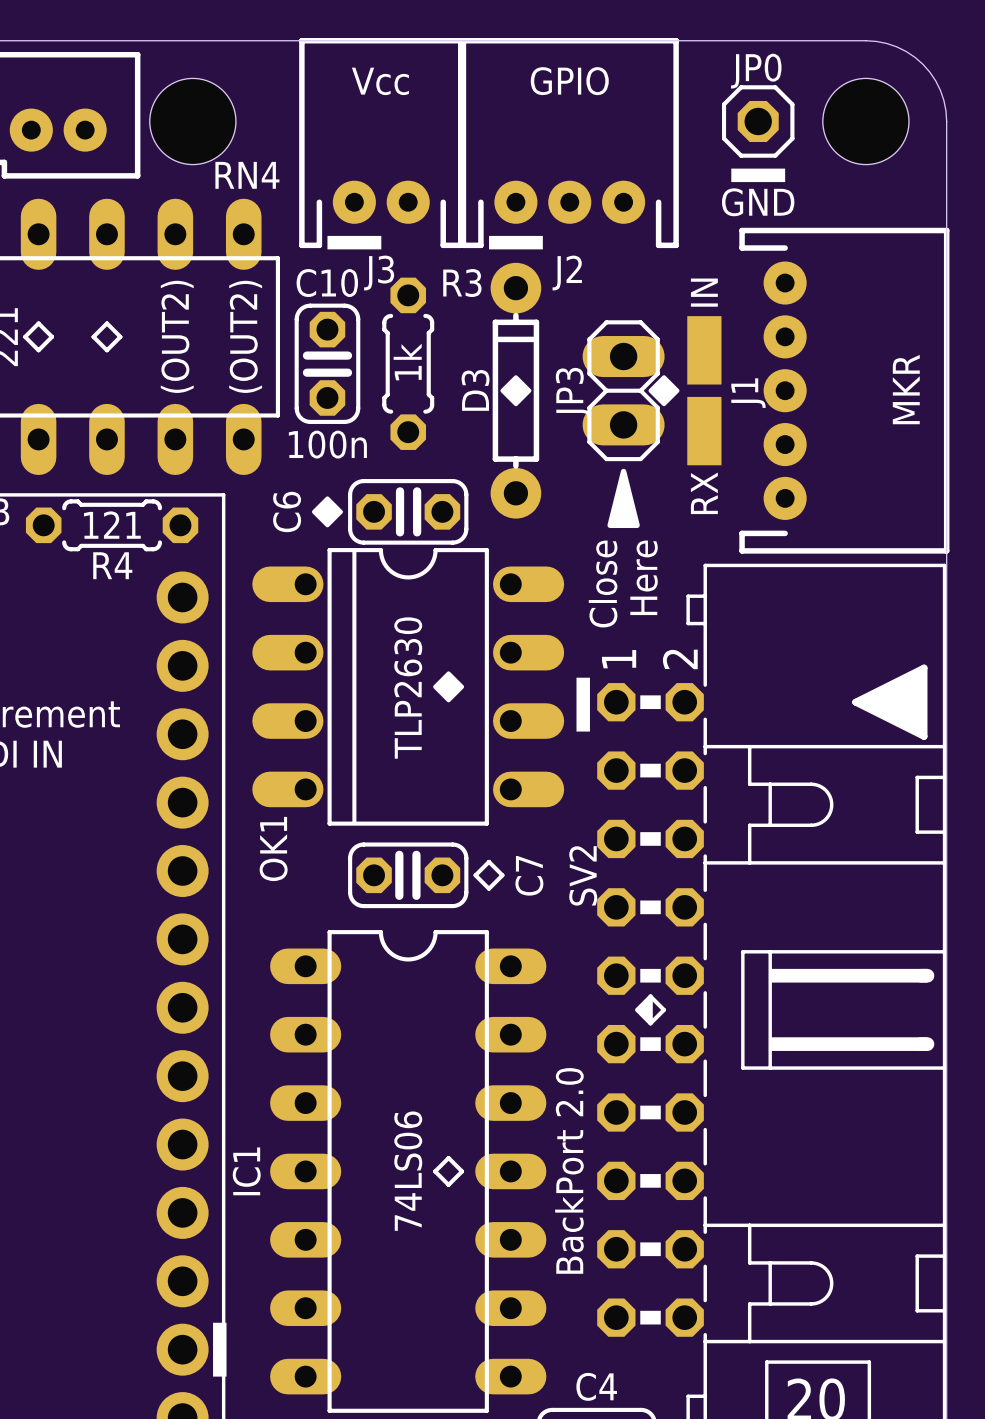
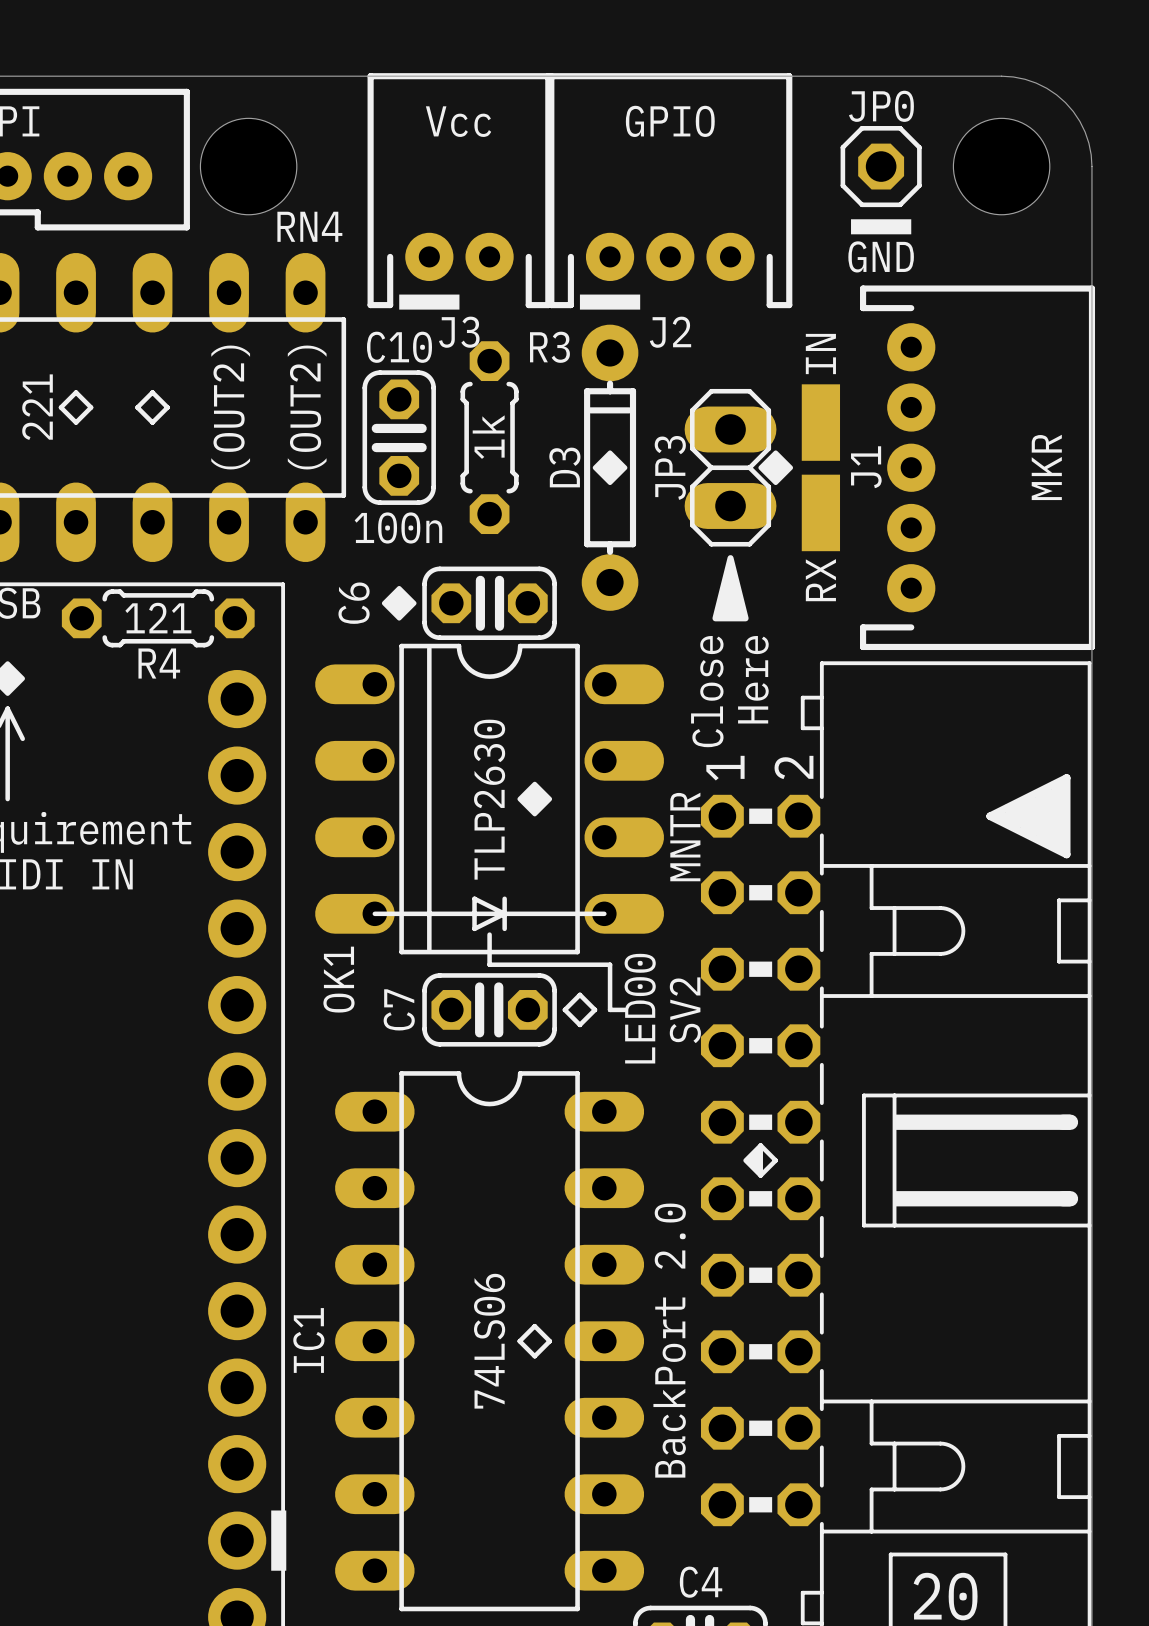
drawing: [576, 677, 590, 732] -> none
text: none -> MNTR (685, 836)
line: none -> (474, 898) (474, 928) (504, 913) (474, 898)
line: none -> (504, 898) (504, 928)
line: none -> (374, 913) (604, 913)
line: none -> (489, 934) (489, 964) (610, 964) (610, 1009) (625, 1009)
text: none -> LED00 (640, 1008)
C7 name position: C7 (529, 875) -> C7 (399, 1009)

